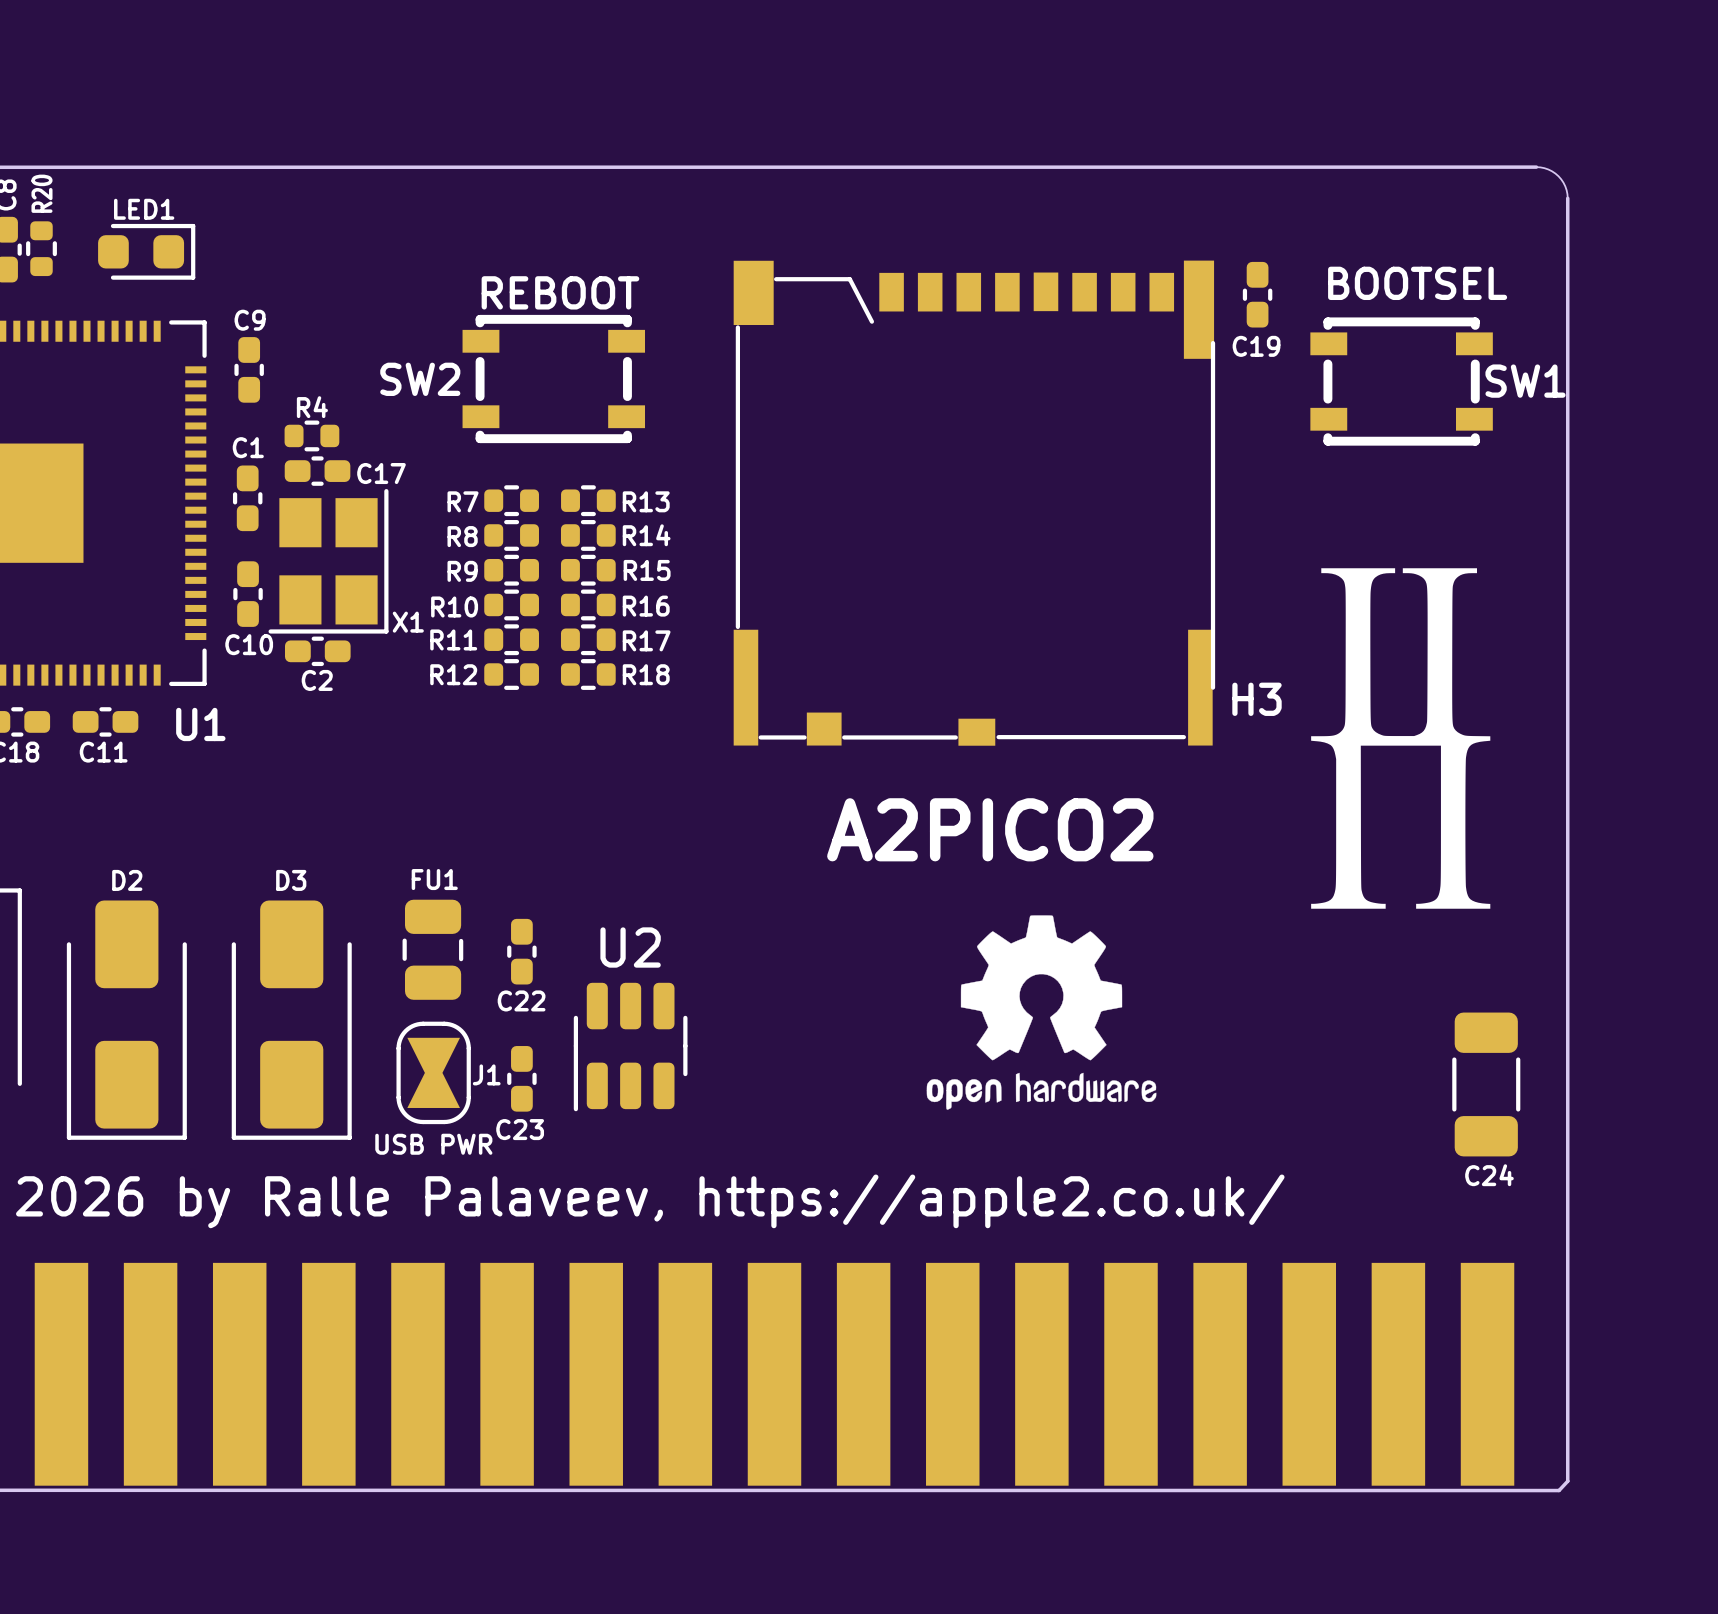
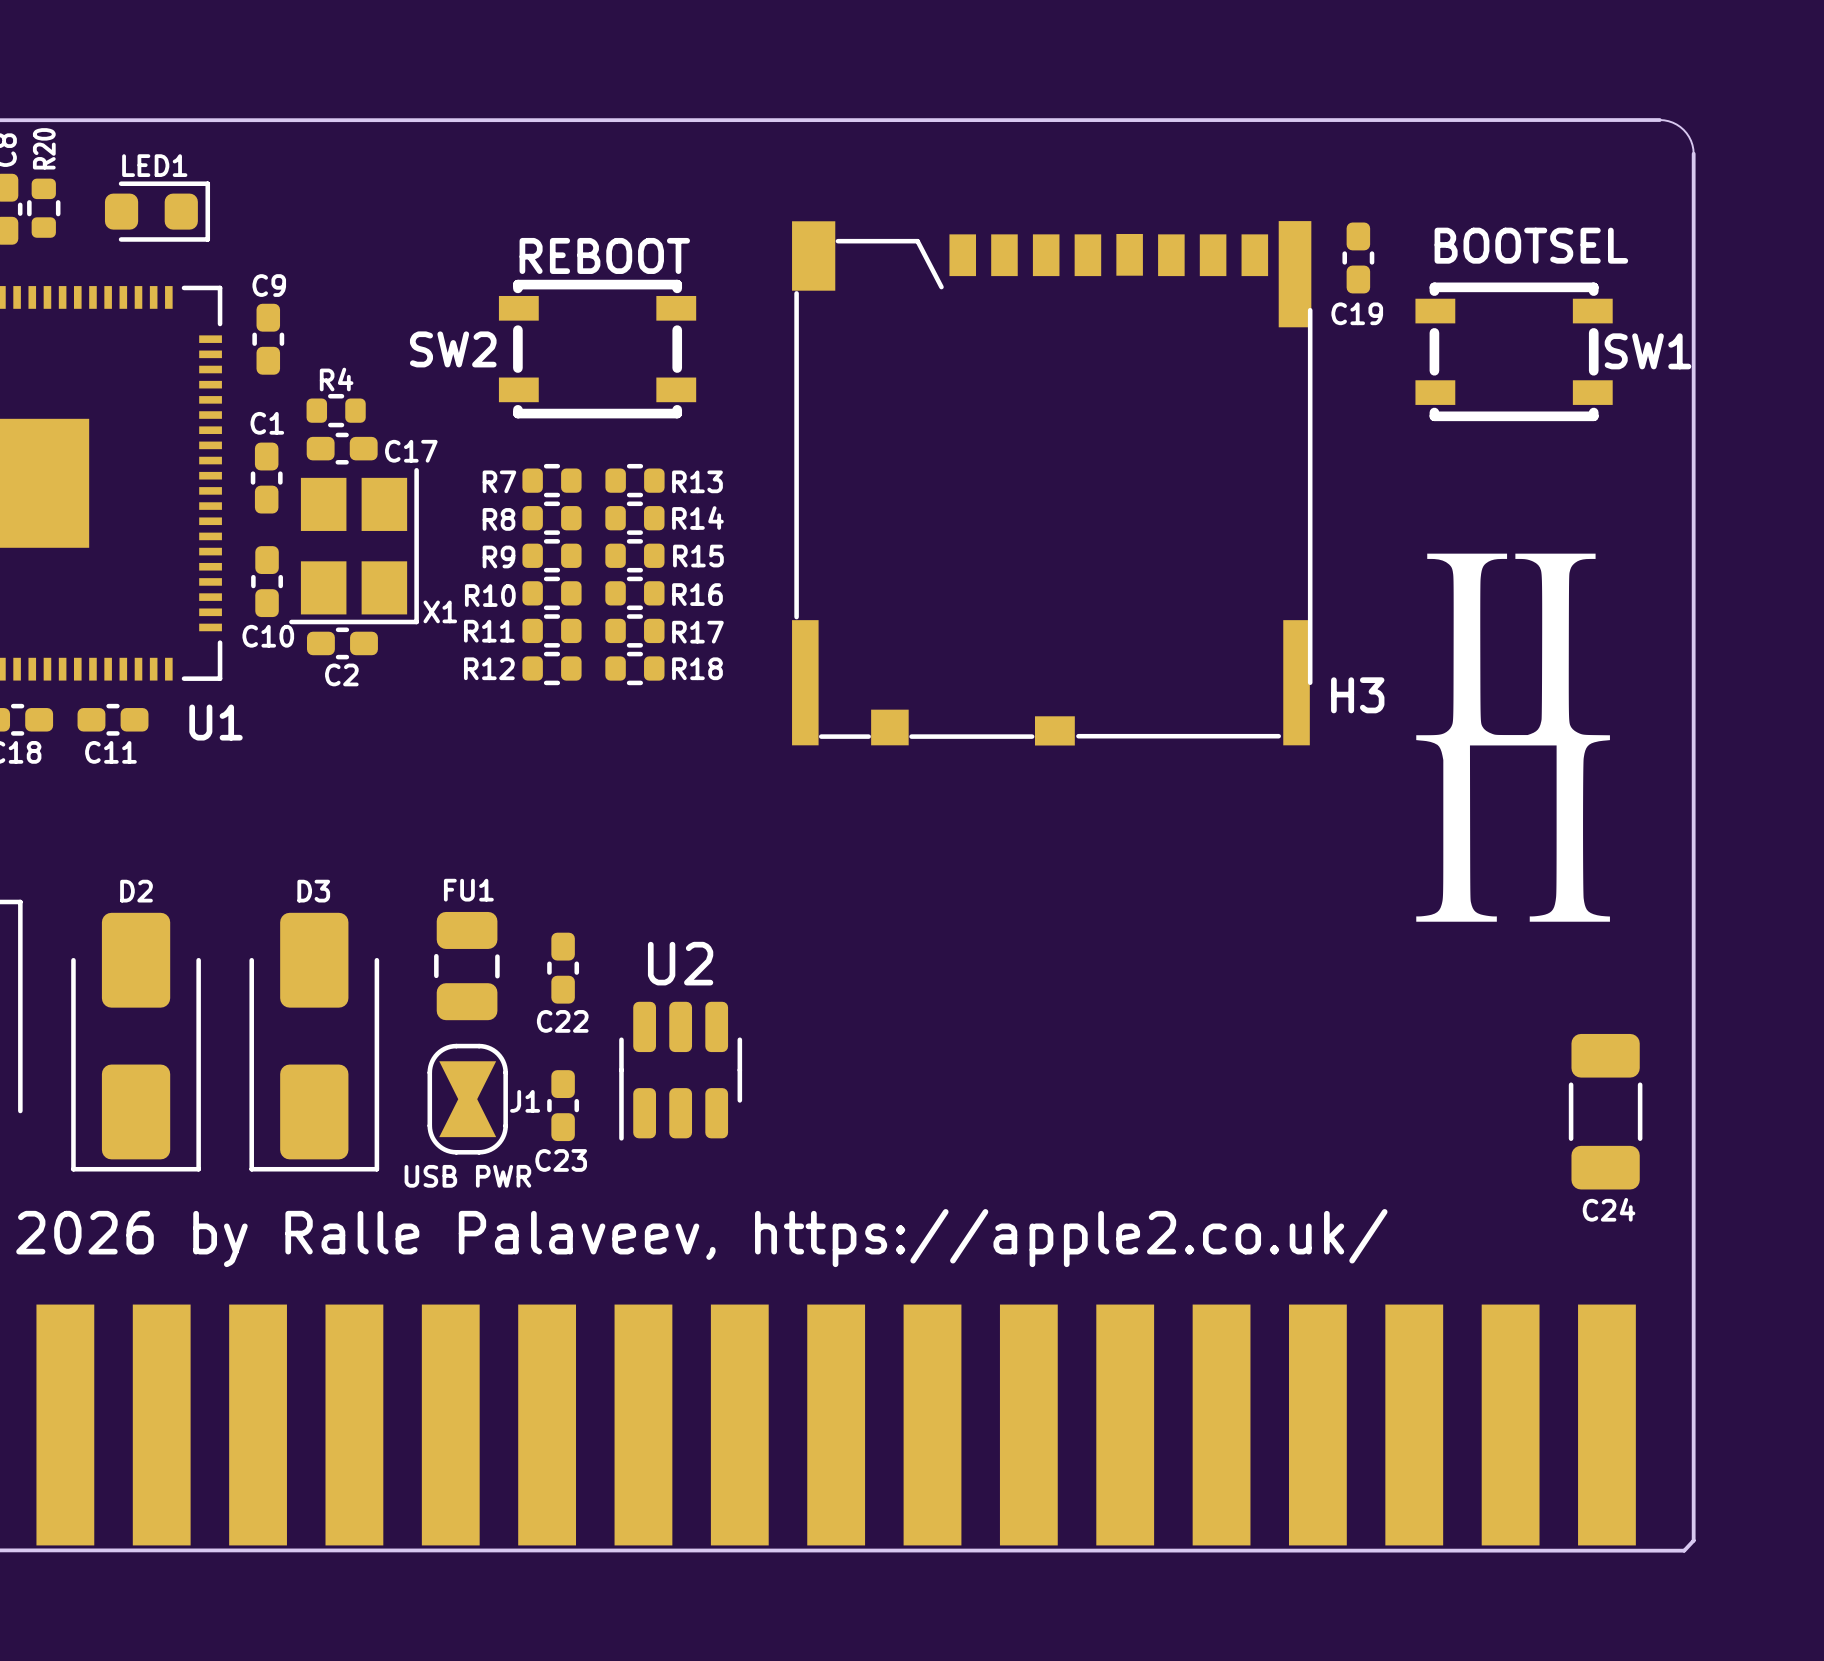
text: A2PICO2 (990, 829) -> none
drawing: [926, 915, 1157, 1110] -> none

